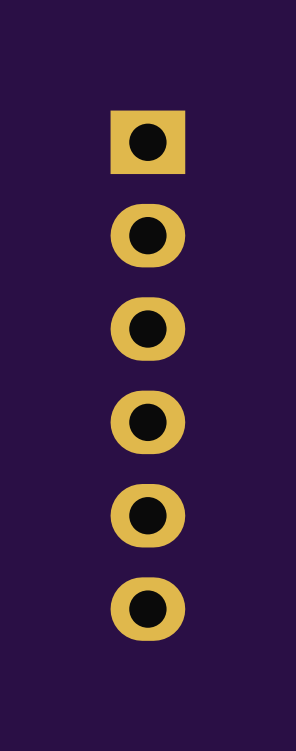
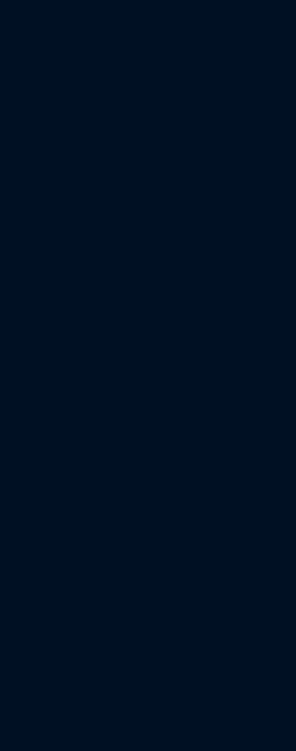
part: (147, 375) -> none

